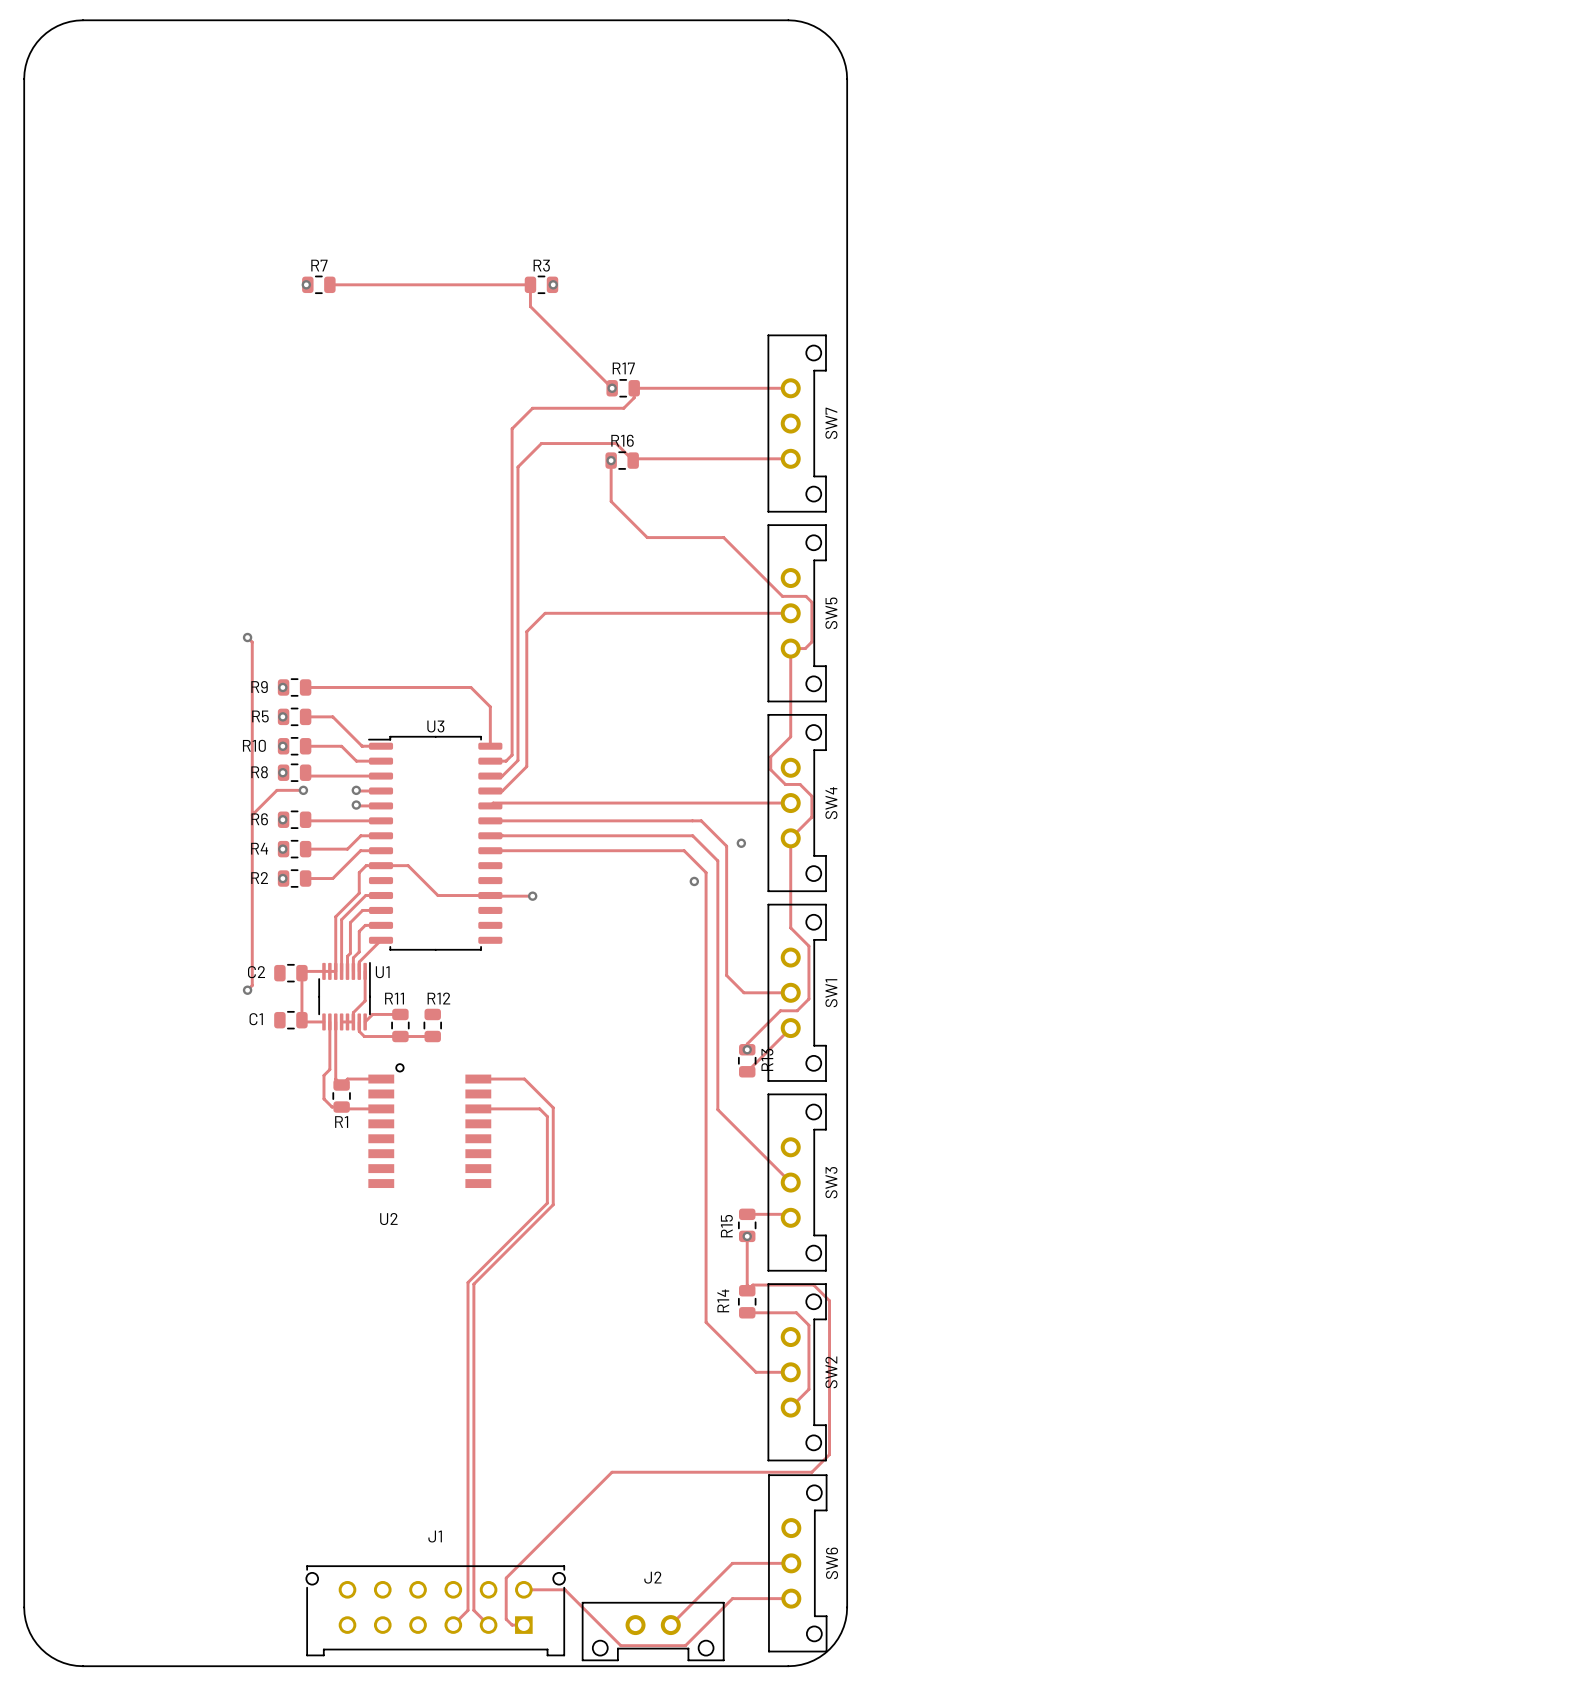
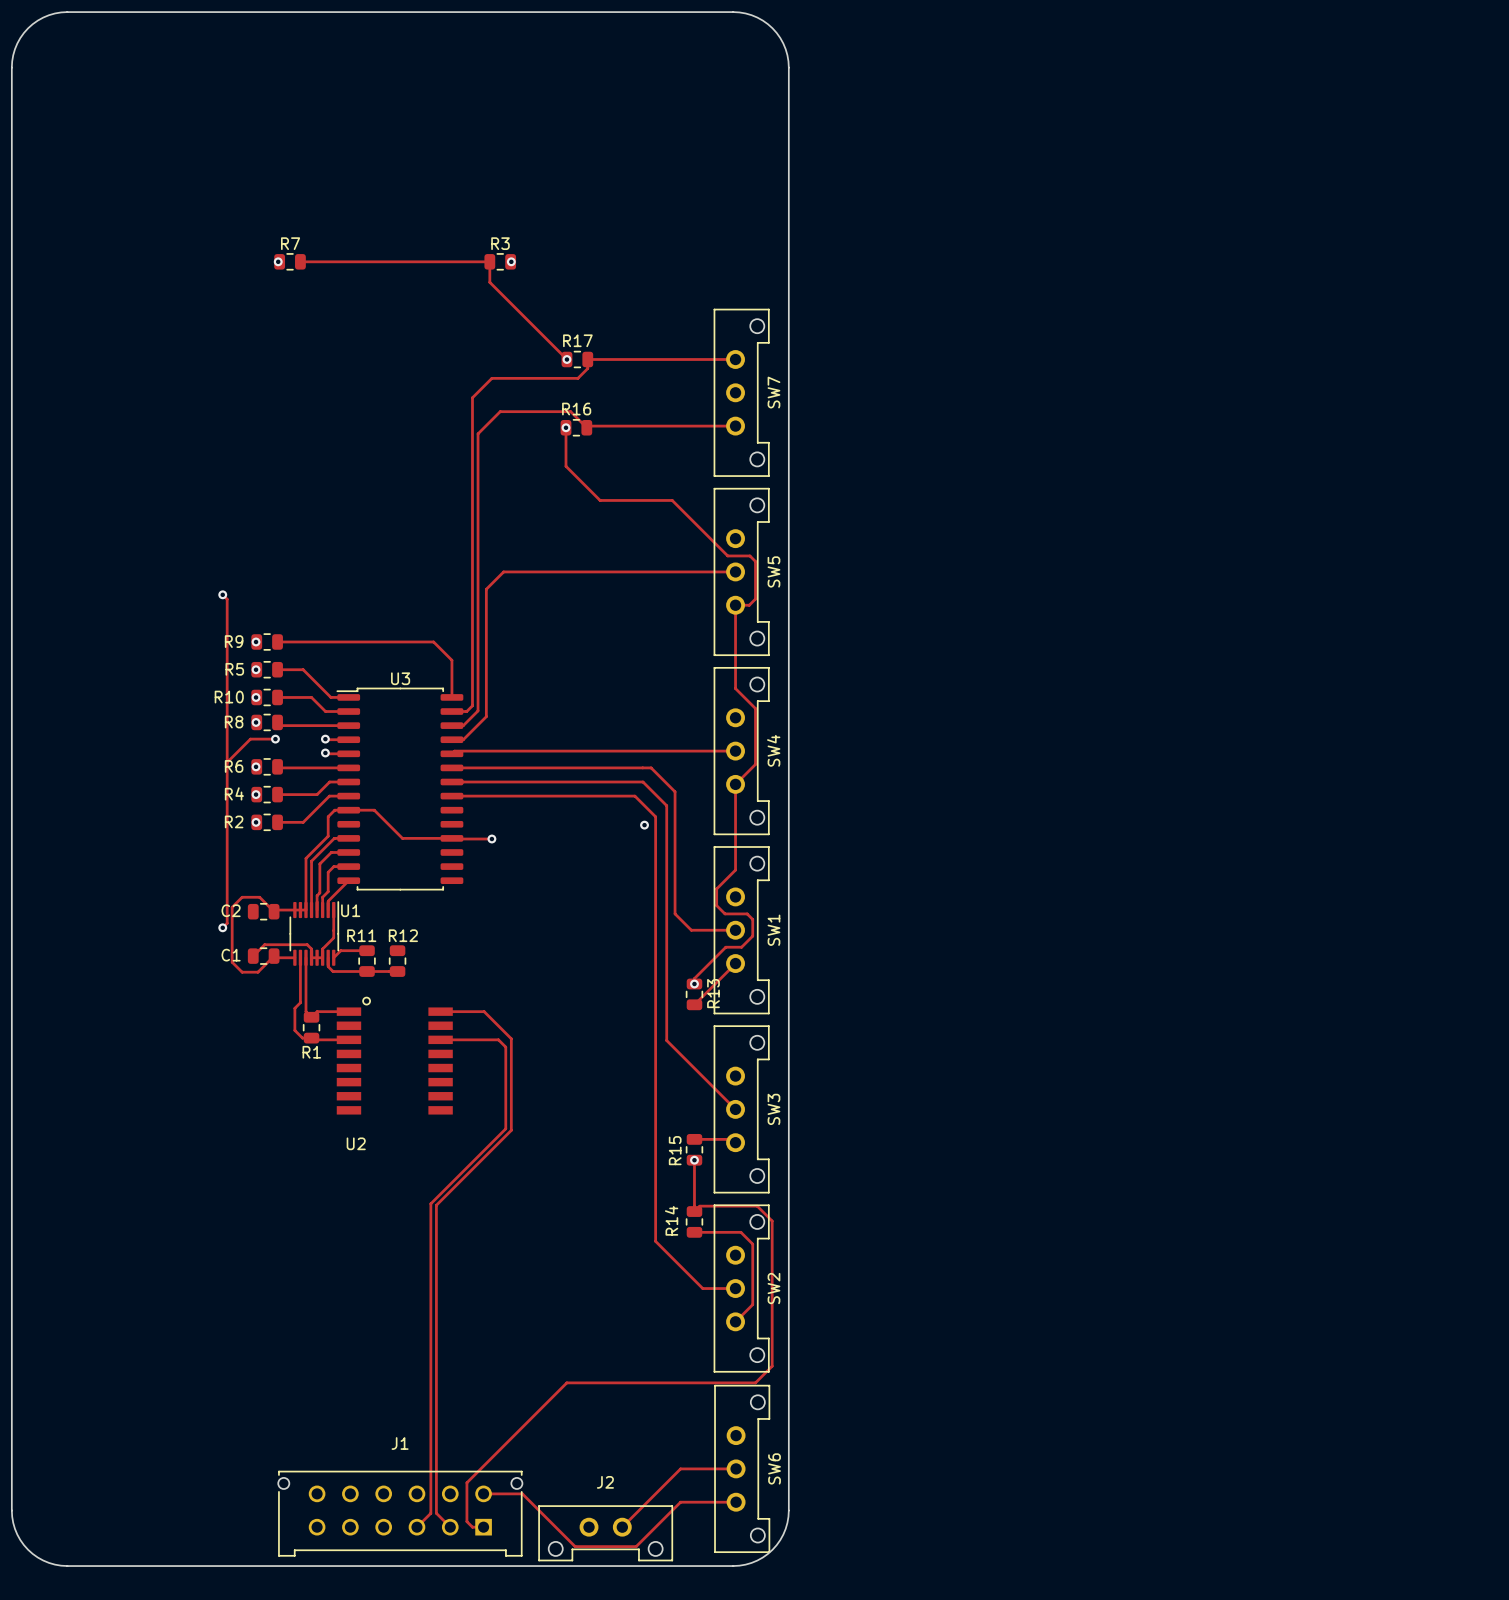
track: (790, 736) (770, 756) (770, 769) (785, 784) (800, 784) (811, 796) -> (735, 688) (755, 708) (755, 744)
via: (741, 843) -> none
track: (790, 927) (808, 946) (808, 981) -> (735, 868) (716, 888) (716, 905) (725, 913) (747, 913) (752, 919)
track: (301, 973) (301, 1020) -> (274, 911) (259, 897) (242, 897) (232, 907) (232, 962) (242, 972) (257, 972) (274, 956)
track: none -> (253, 956) (264, 944) (307, 944) (311, 948) (311, 957)

